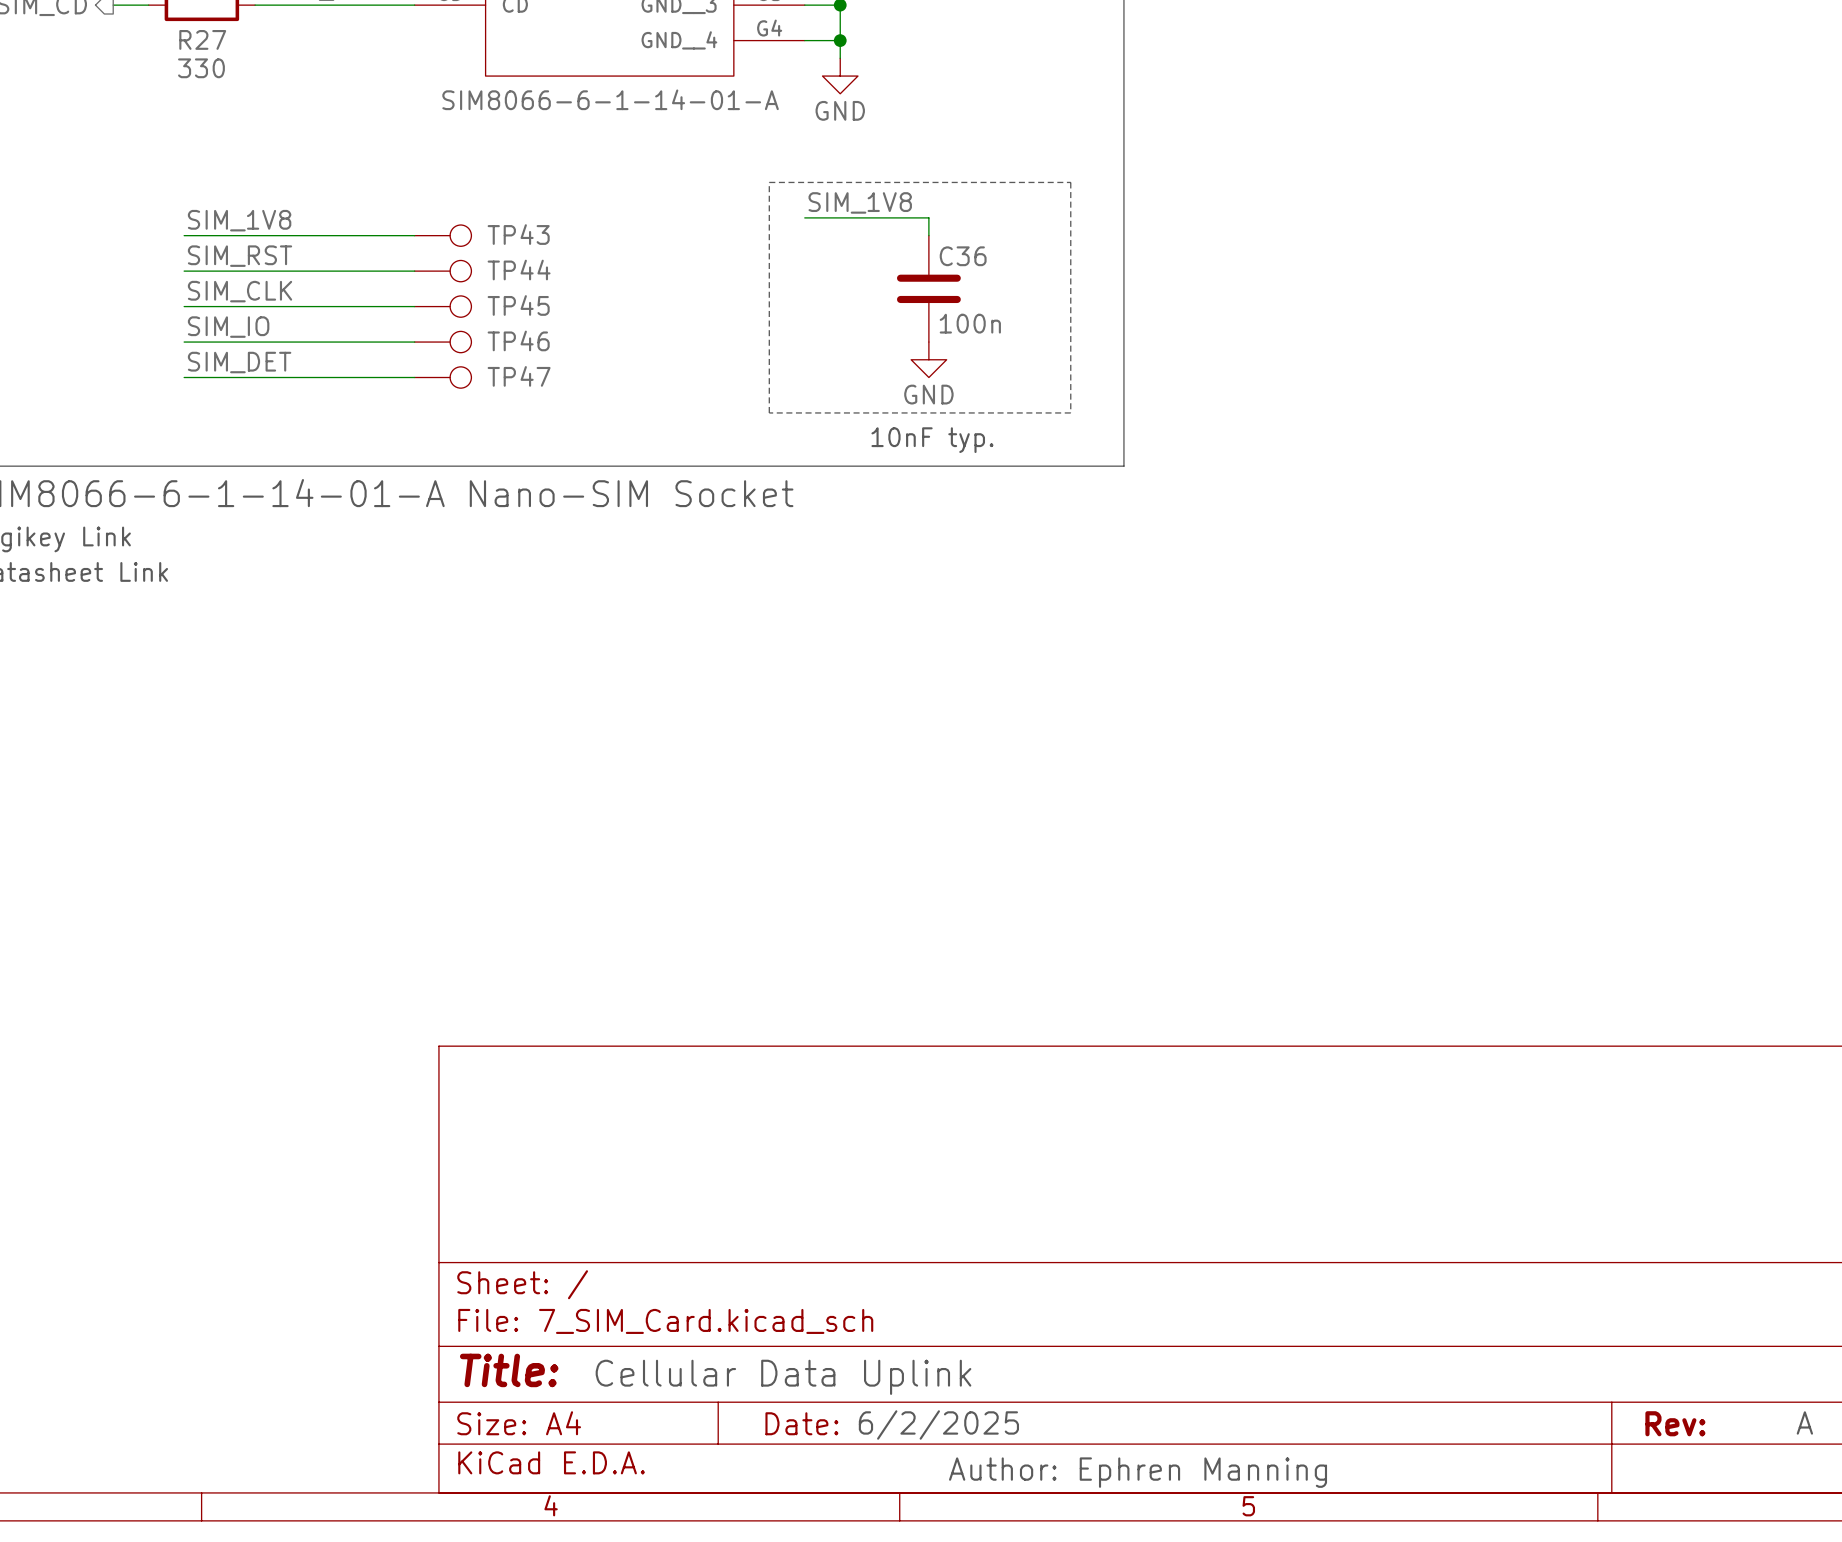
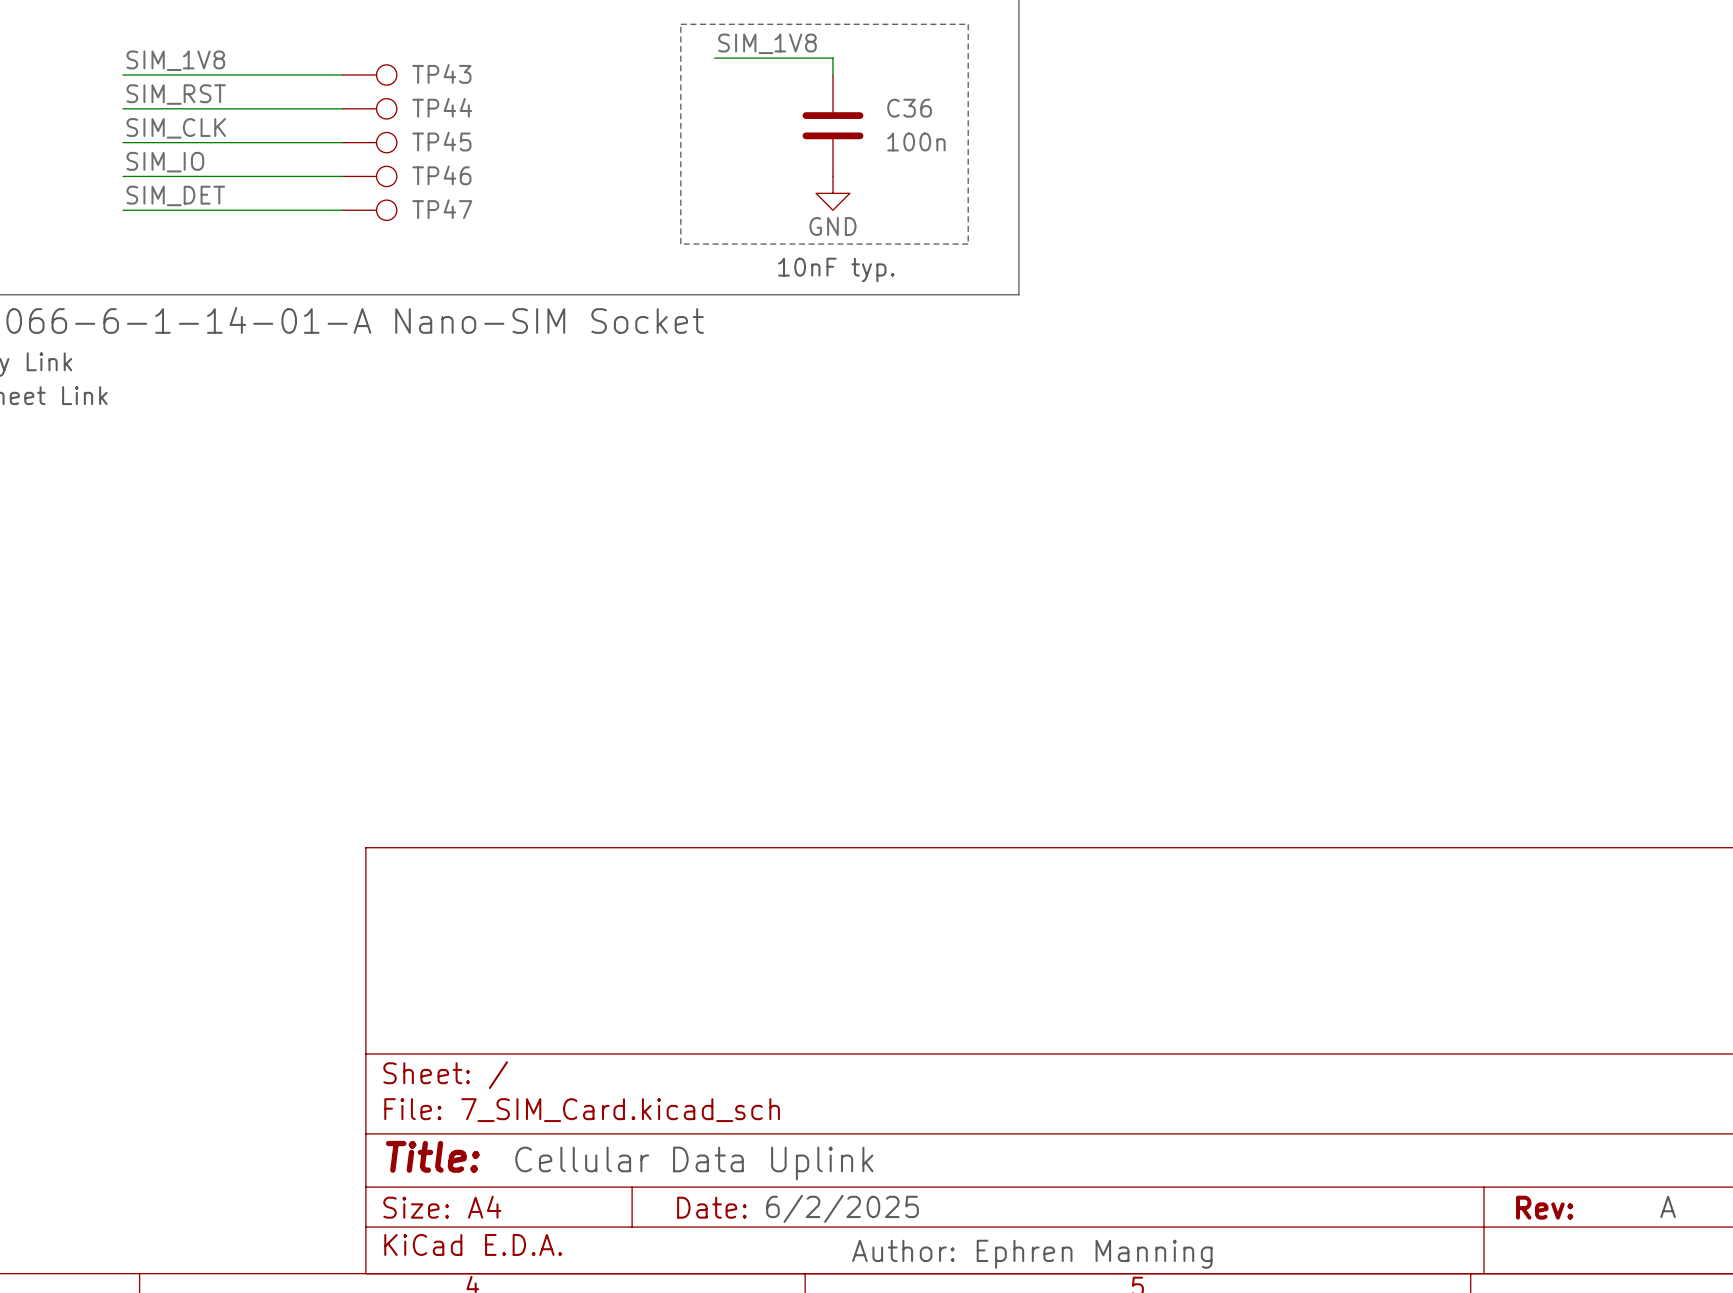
C36 name position: C36 (963, 256) -> C36 (909, 108)
C36 value position: 100n (970, 323) -> 100n (916, 141)

